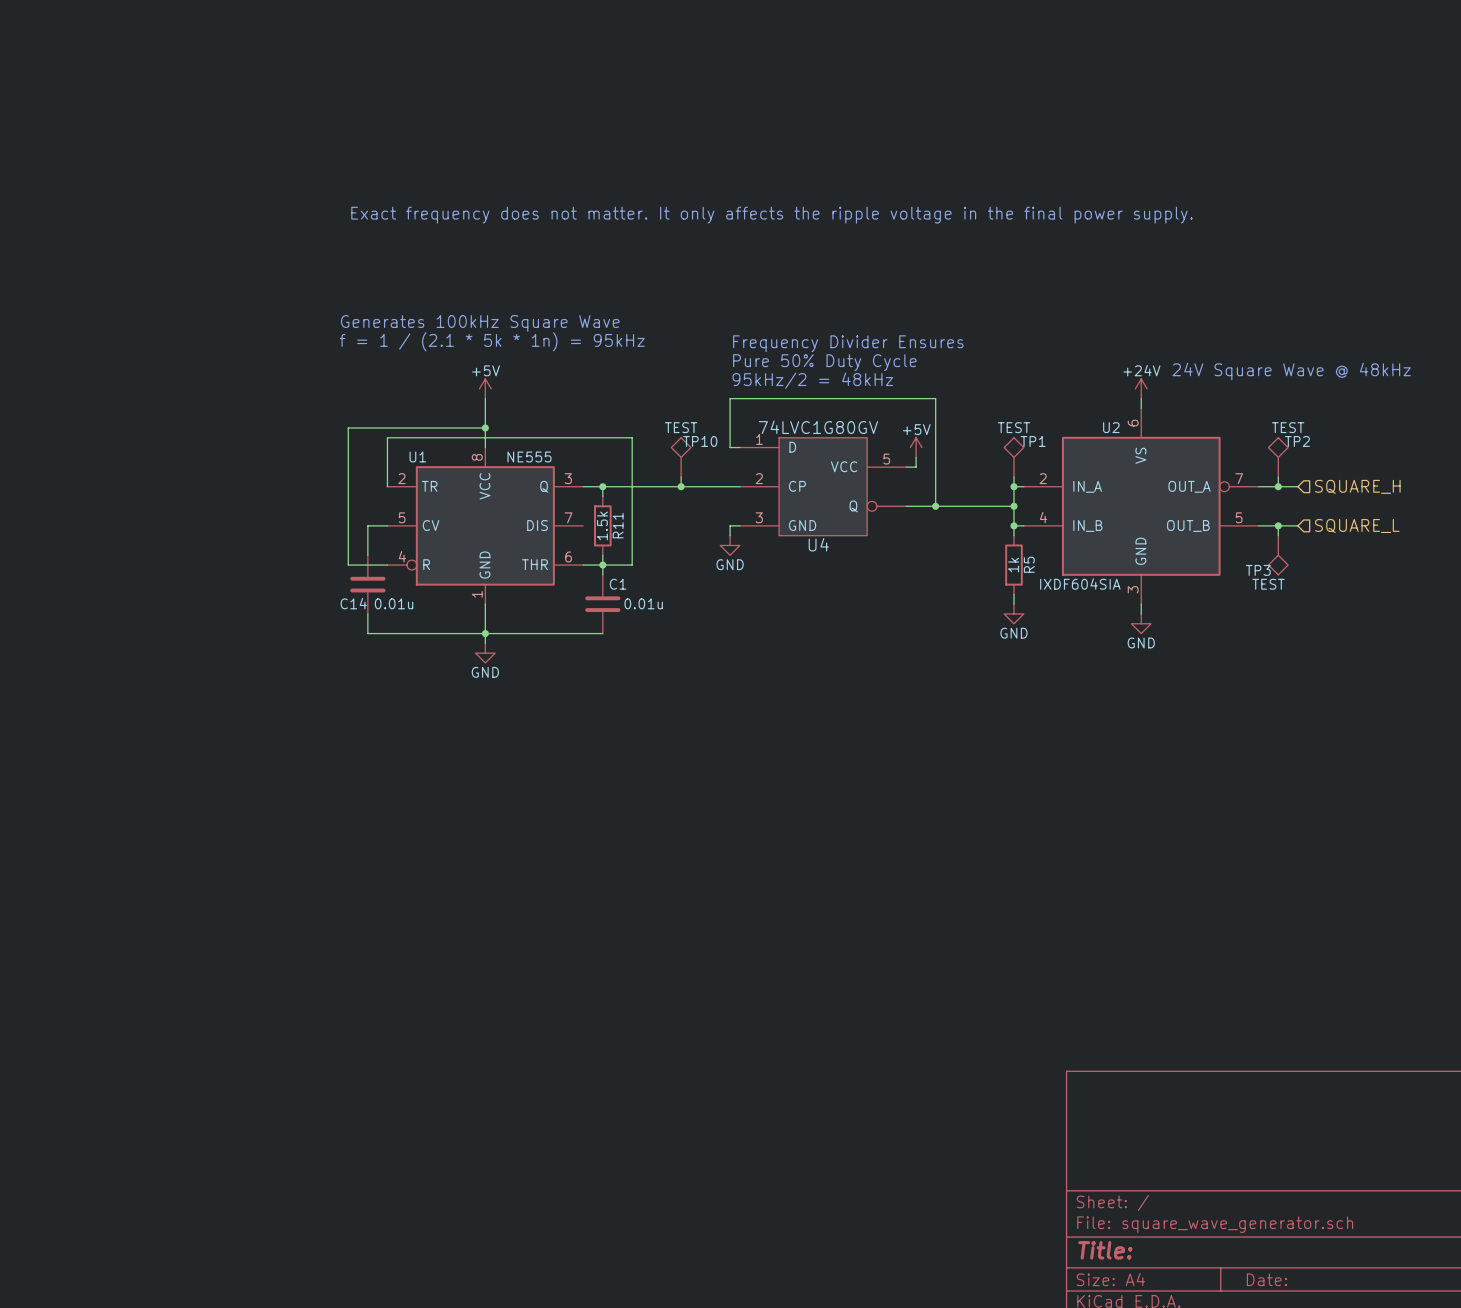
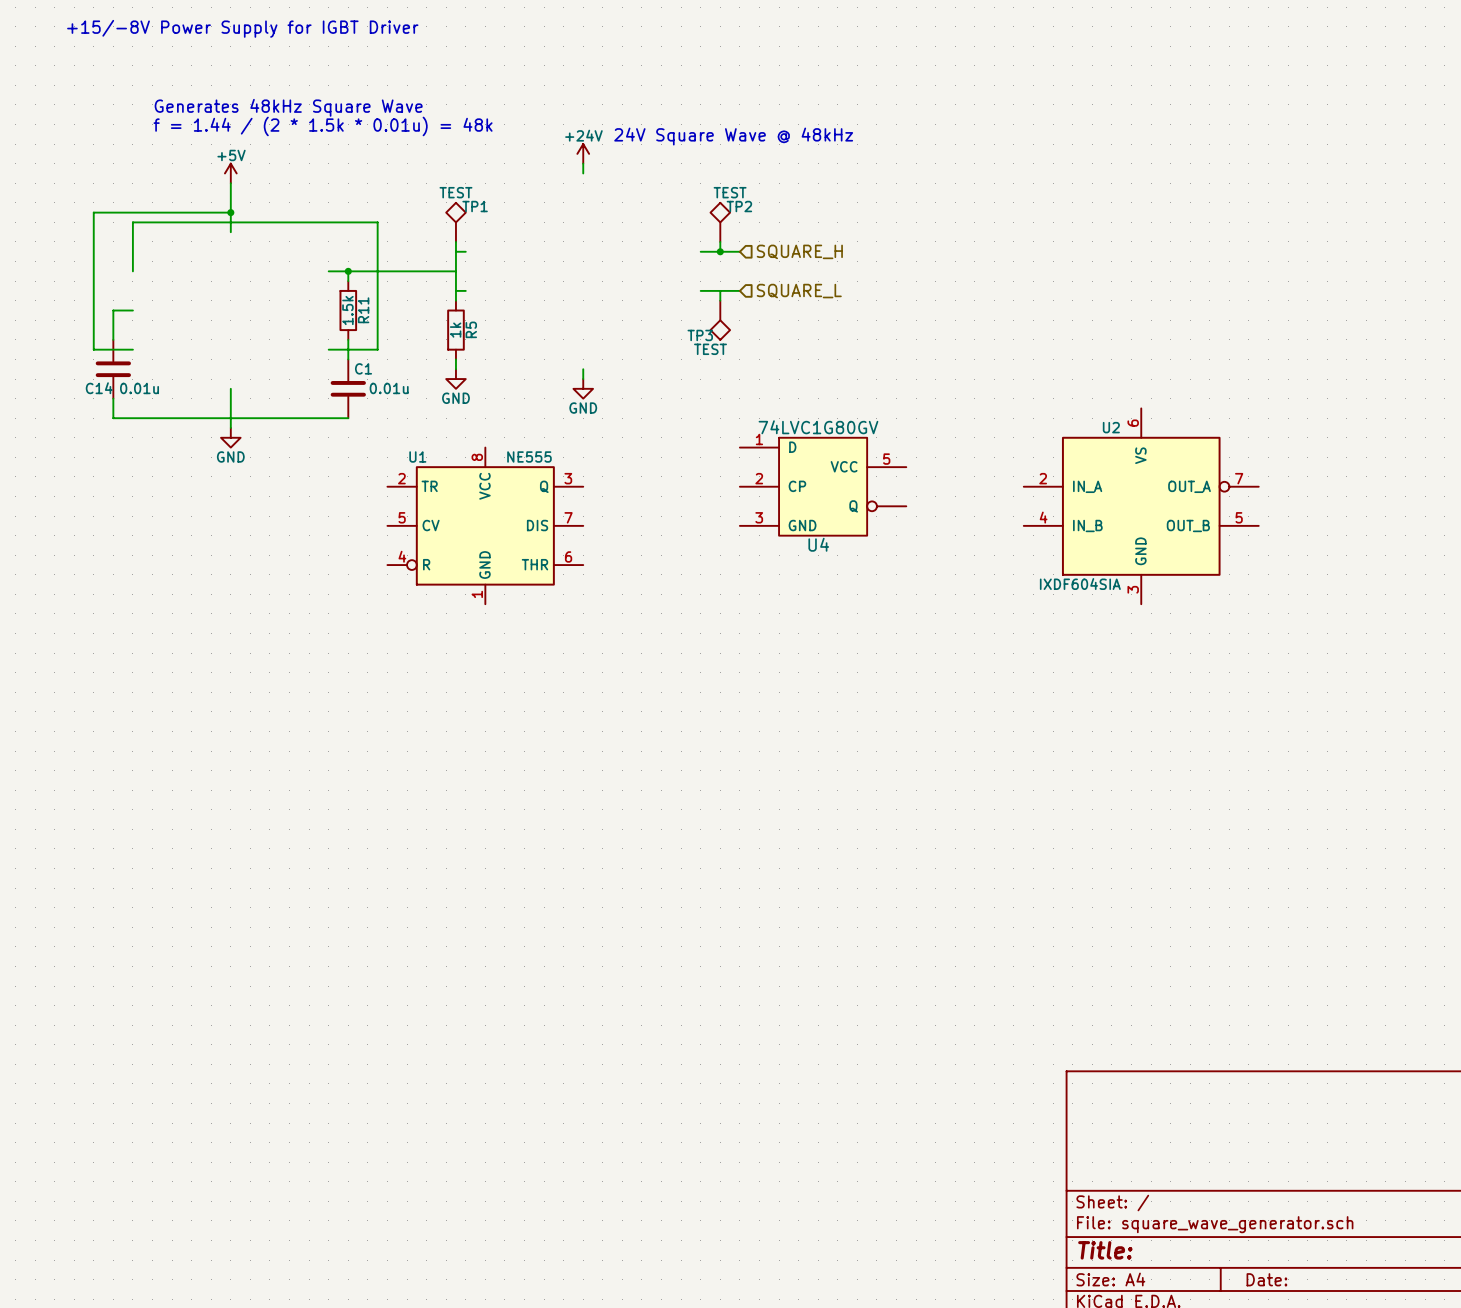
text: none -> +15/-8V Power Supply for IGBT Driver (242, 28)
text: none -> Generates 48kHz Square Wave (288, 107)
text: none -> f = 1.44 / (2 * 1.5k * 0.01u) = 48k (323, 126)
text: none -> 24V Square Wave @ 48kHz (733, 136)
power symbol: none -> +24V (583, 153)
wire: none -> (583, 163) (583, 173)
power symbol: none -> +5V (230, 173)
wire: none -> (230, 183) (230, 232)
wire: none -> (230, 212) (93, 212) (93, 349) (132, 349)
junction: none -> (230, 212)
text: Exact frequency does not matter. It only affects the ripple voltage in the final power supply. (771, 215) -> none
wire: none -> (455, 241) (455, 300)
wire: none -> (720, 241) (720, 251)
wire: none -> (455, 251) (465, 251)
wire: none -> (700, 251) (739, 251)
junction: none -> (720, 251)
hierarchical label: none -> SQUARE_H (799, 251)
wire: none -> (132, 271) (132, 222) (377, 222) (377, 349) (328, 349)
wire: none -> (328, 271) (455, 271)
wire: none -> (348, 271) (348, 281)
junction: none -> (348, 271)
wire: none -> (455, 290) (465, 290)
wire: none -> (700, 290) (739, 290)
hierarchical label: none -> SQUARE_L (799, 291)
wire: none -> (132, 310) (113, 310) (113, 339)
text: Generates 100kHz Square Wave (480, 323) -> none
wire: none -> (348, 339) (348, 359)
text: f = 1 / (2.1 * 5k * 1n) = 95kHz (492, 341) -> none
text: Frequency Divider Ensures (848, 343) -> none
wire: none -> (455, 359) (455, 369)
text: Pure 50% Duty Cycle (824, 362) -> none
text: 24V Square Wave @ 48kHz (1291, 371) -> none
power symbol: none -> GND (455, 379)
text: 95kHz/2 = 48kHz (812, 380) -> none
wire: none -> (230, 388) (230, 427)
power symbol: +5V (485, 388) -> none
power symbol: none -> GND (583, 388)
power symbol: +24V (1141, 388) -> none
wire: none -> (113, 398) (113, 418) (348, 418)
wire: (485, 398) (485, 447) -> none
wire: (1141, 398) (1141, 408) -> none
wire: (485, 427) (348, 427) (348, 565) (387, 565) -> none
junction: (485, 427) -> none
power symbol: none -> GND (230, 437)
wire: (739, 447) (730, 447) (730, 398) (935, 398) (935, 506) -> none
power symbol: +5V (916, 447) -> none
TP10: TEST (681, 457) -> none
wire: (916, 457) (916, 467) (906, 467) -> none
TP1 position: (1013, 457) -> (455, 222)
TP2 position: (1278, 457) -> (720, 222)
wire: (681, 476) (681, 486) -> (720, 290) (720, 300)
wire: (1013, 476) (1013, 535) -> none
wire: (1278, 476) (1278, 486) -> none
wire: (387, 486) (387, 437) (632, 437) (632, 565) (583, 565) -> none
wire: (583, 486) (739, 486) -> none
wire: (602, 486) (602, 496) -> (583, 369) (583, 379)
junction: (602, 486) -> none
junction: (681, 486) -> none
wire: (1013, 486) (1023, 486) -> none
junction: (1013, 486) -> none
wire: (1258, 486) (1297, 486) -> none
junction: (1278, 486) -> none
hierarchical label: SQUARE_H (1357, 486) -> none
wire: (906, 506) (1013, 506) -> none
junction: (935, 506) -> none
junction: (1013, 506) -> none
wire: (387, 525) (367, 525) (367, 555) -> none
R11 position: (602, 525) -> (348, 310)
wire: (739, 525) (730, 525) (730, 535) -> none
wire: (1013, 525) (1023, 525) -> none
junction: (1013, 525) -> none
wire: (1258, 525) (1297, 525) -> none
wire: (1278, 525) (1278, 535) -> none
junction: (1278, 525) -> none
hierarchical label: SQUARE_L (1357, 526) -> none
power symbol: GND (730, 545) -> none
wire: (602, 555) (602, 574) -> none
TP3 position: (1278, 555) -> (720, 320)
junction: (602, 565) -> none
R5 position: (1013, 565) -> (455, 330)
C14 position: (367, 584) -> (113, 369)
wire: (1013, 594) (1013, 604) -> none
wire: (485, 604) (485, 643) -> none
C1 position: (602, 604) -> (348, 388)
wire: (1141, 604) (1141, 613) -> none
wire: (367, 613) (367, 633) (602, 633) -> none
power symbol: GND (1013, 613) -> none
power symbol: GND (1141, 623) -> none
junction: (485, 633) -> none
power symbol: GND (485, 653) -> none

